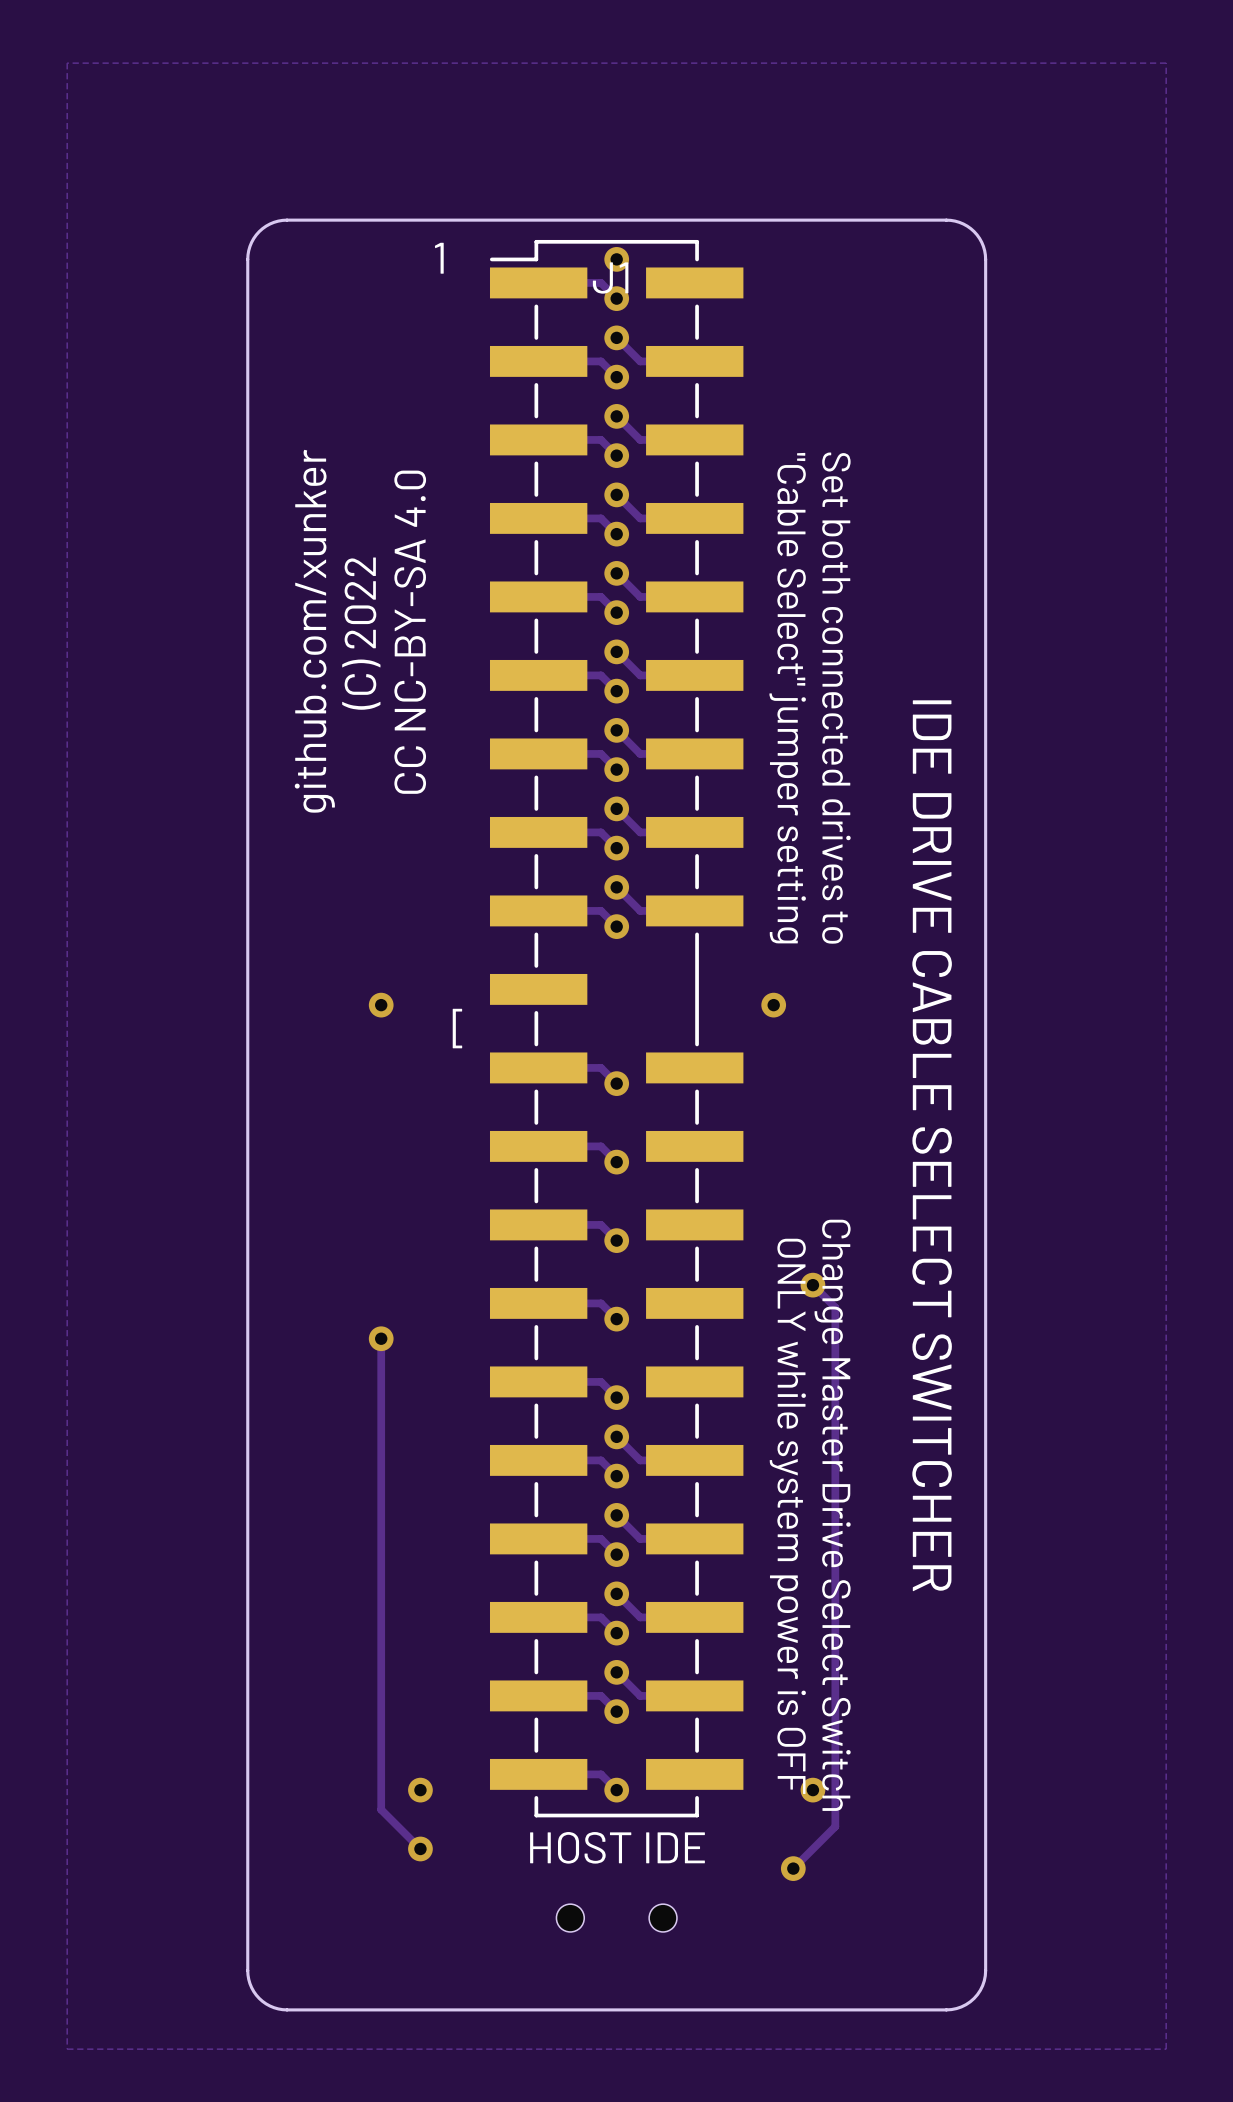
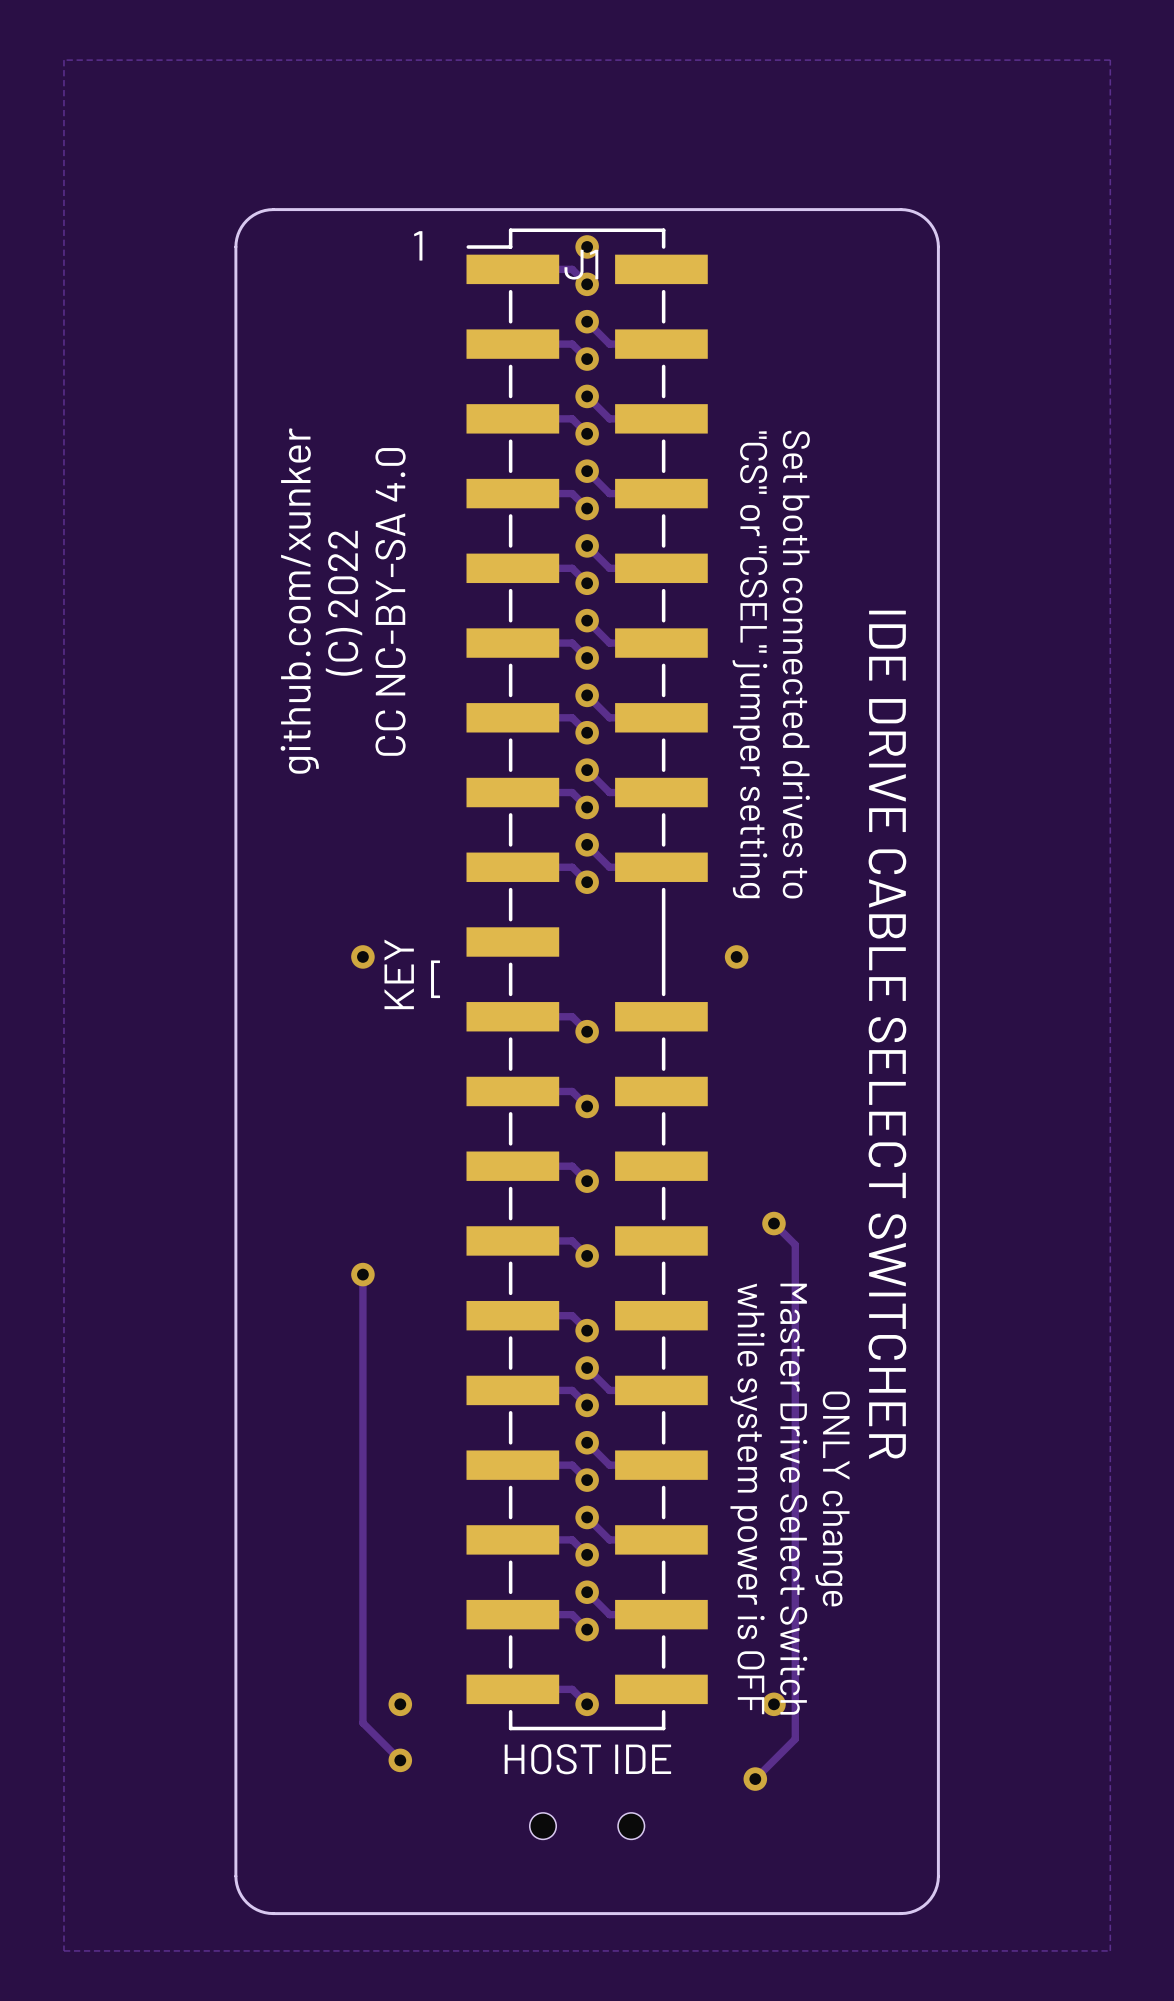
text: "Cable Select" jumper setting (787, 698) -> "CS" or "CSEL" jumper setting (749, 664)
text: none -> KEY (399, 974)
text position: IDE DRIVE CABLE SELECT SWITCHER (932, 1145) -> IDE DRIVE CABLE SELECT SWITCHER (887, 1034)
text: Change Master Drive Select Switch (832, 1515) -> Master Drive Select Switch (793, 1499)
text: ONLY while system power is OFF (787, 1516) -> while system power is OFF (747, 1498)
text: none -> ONLY change (832, 1499)

